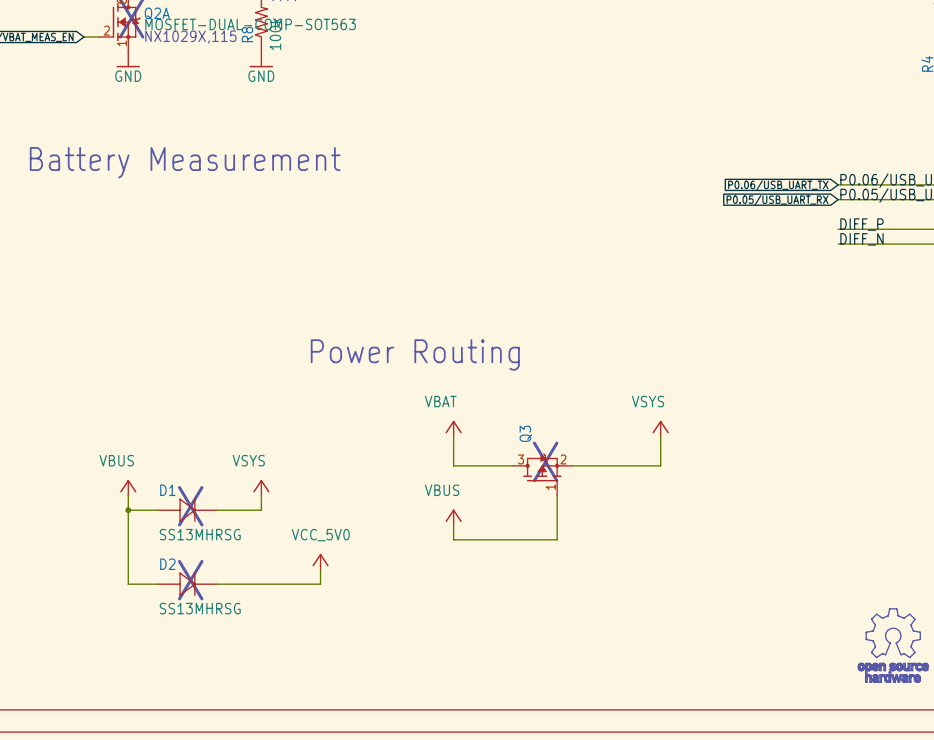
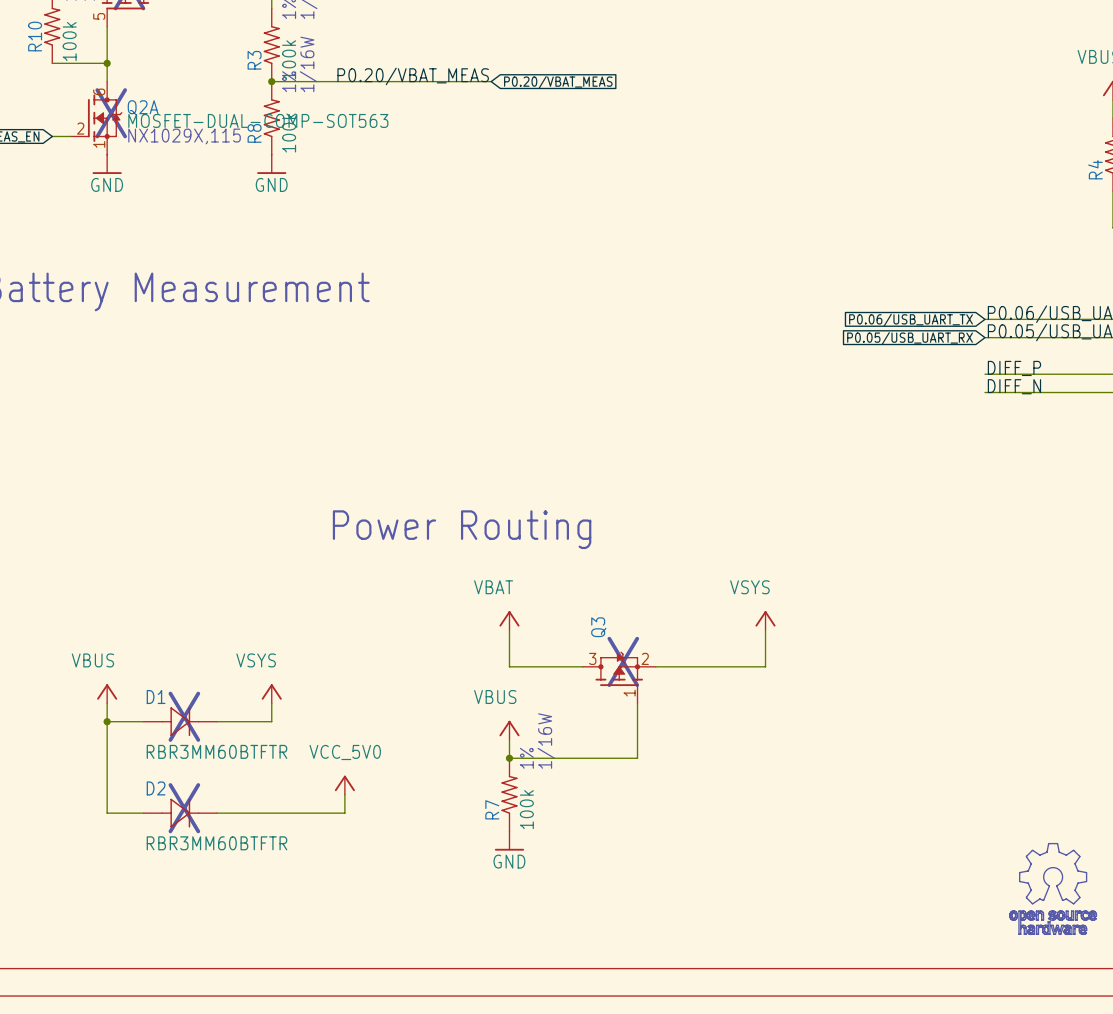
D1 text: SS13MHRSG (200, 534) -> RBR3MM60BTFTR (216, 751)
junction: none -> (509, 758)
R7: none -> 100k (509, 794)
power symbol: none -> GND (509, 841)
D2 text: SS13MHRSG (200, 608) -> RBR3MM60BTFTR (216, 843)

